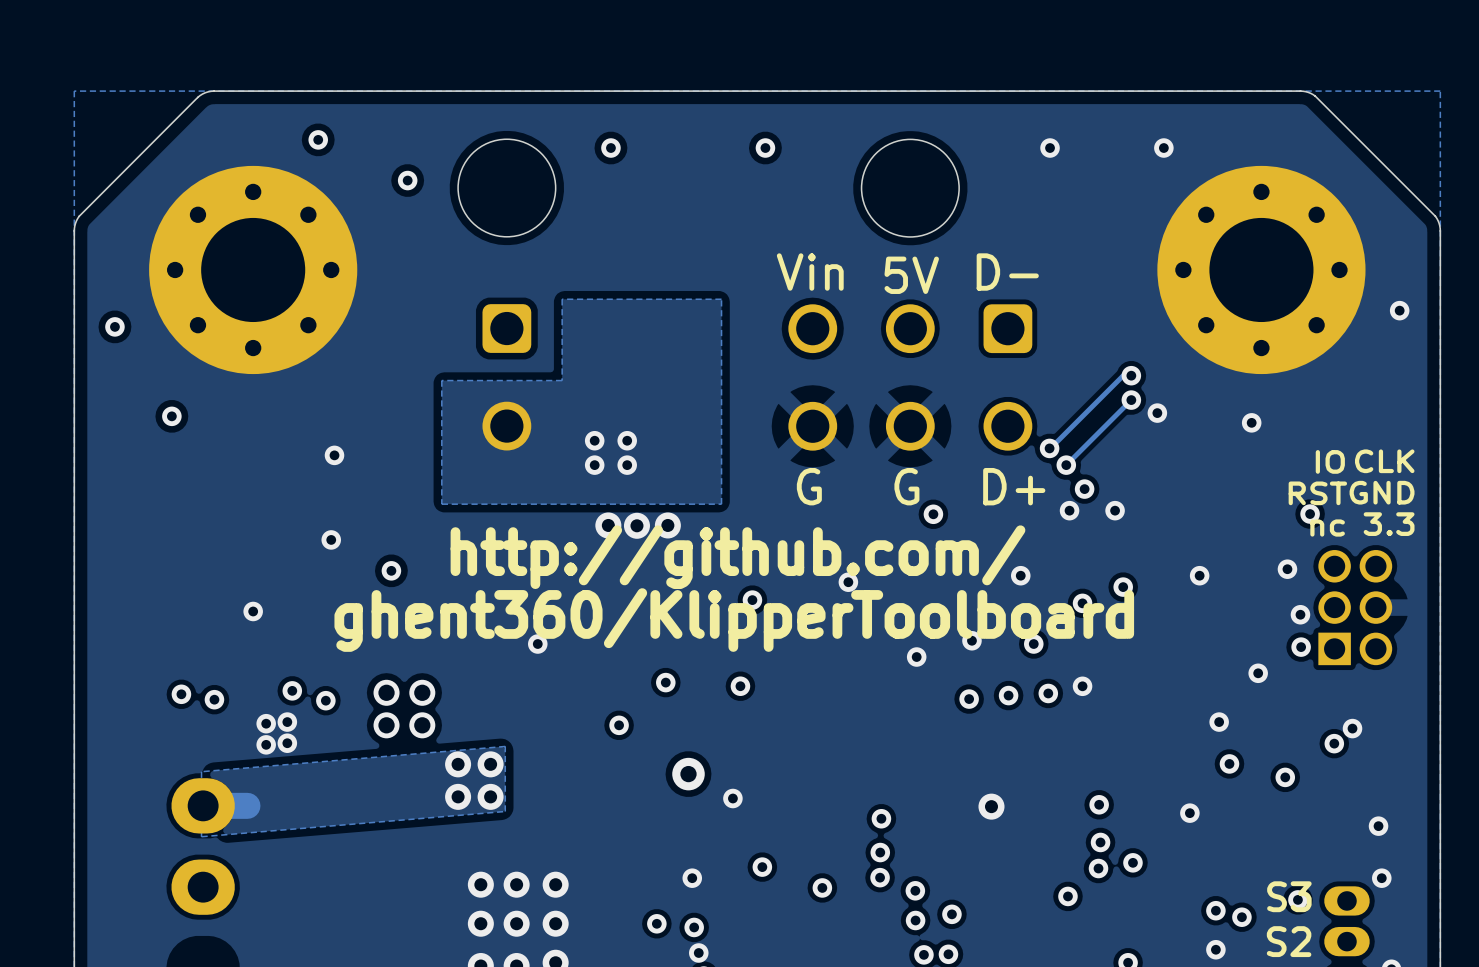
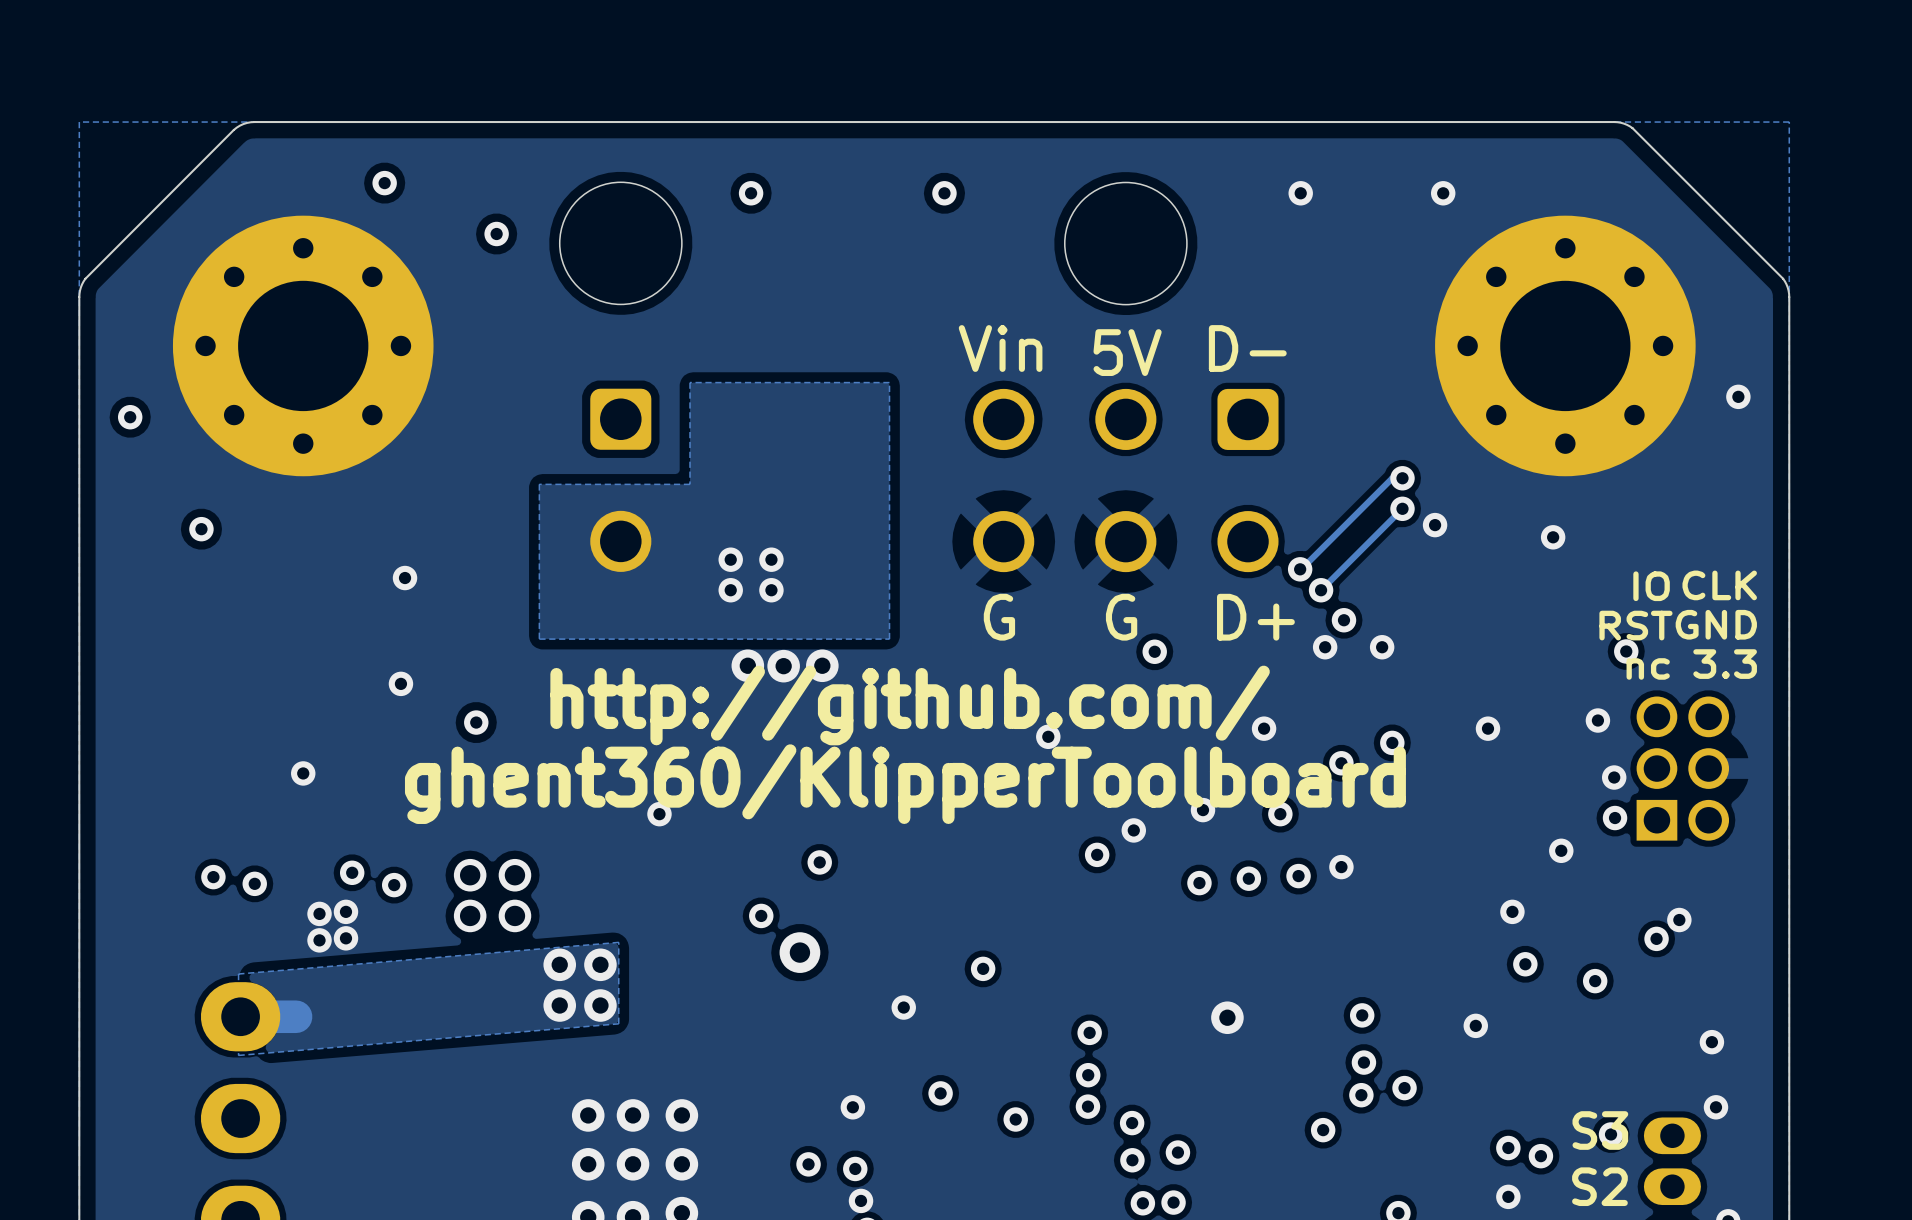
via: (752, 600) -> none
via: none -> (1097, 854)
via: (740, 686) -> none
via: none -> (983, 968)
via position: (688, 774) -> (799, 952)

